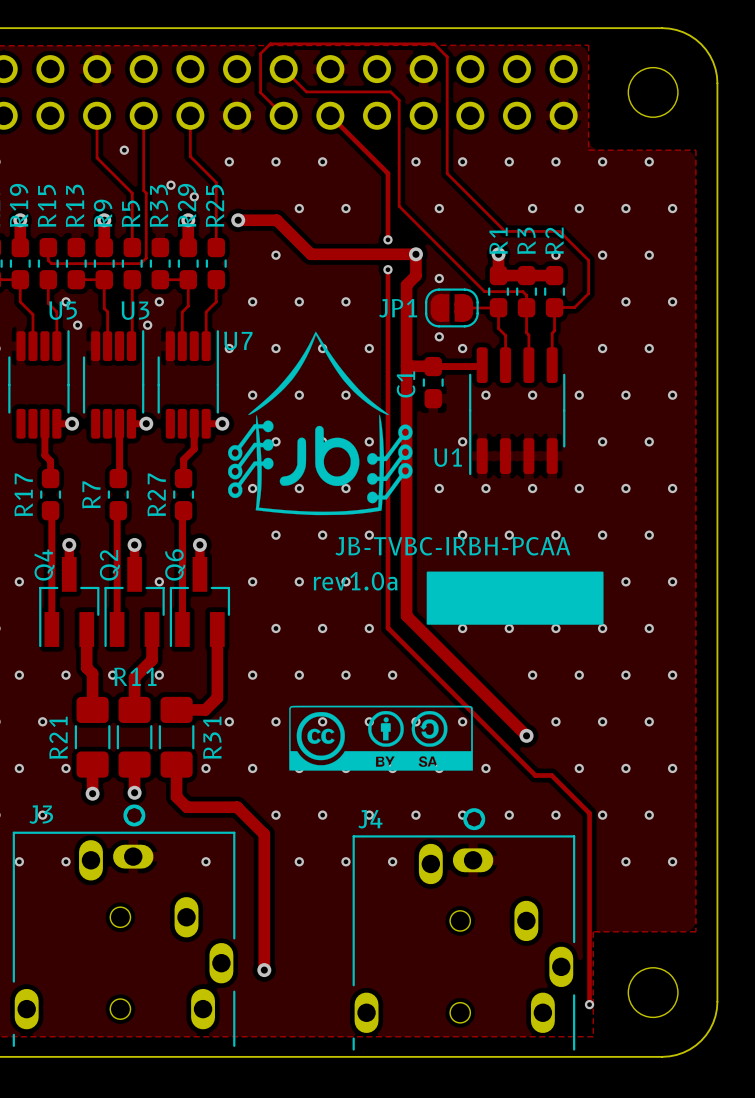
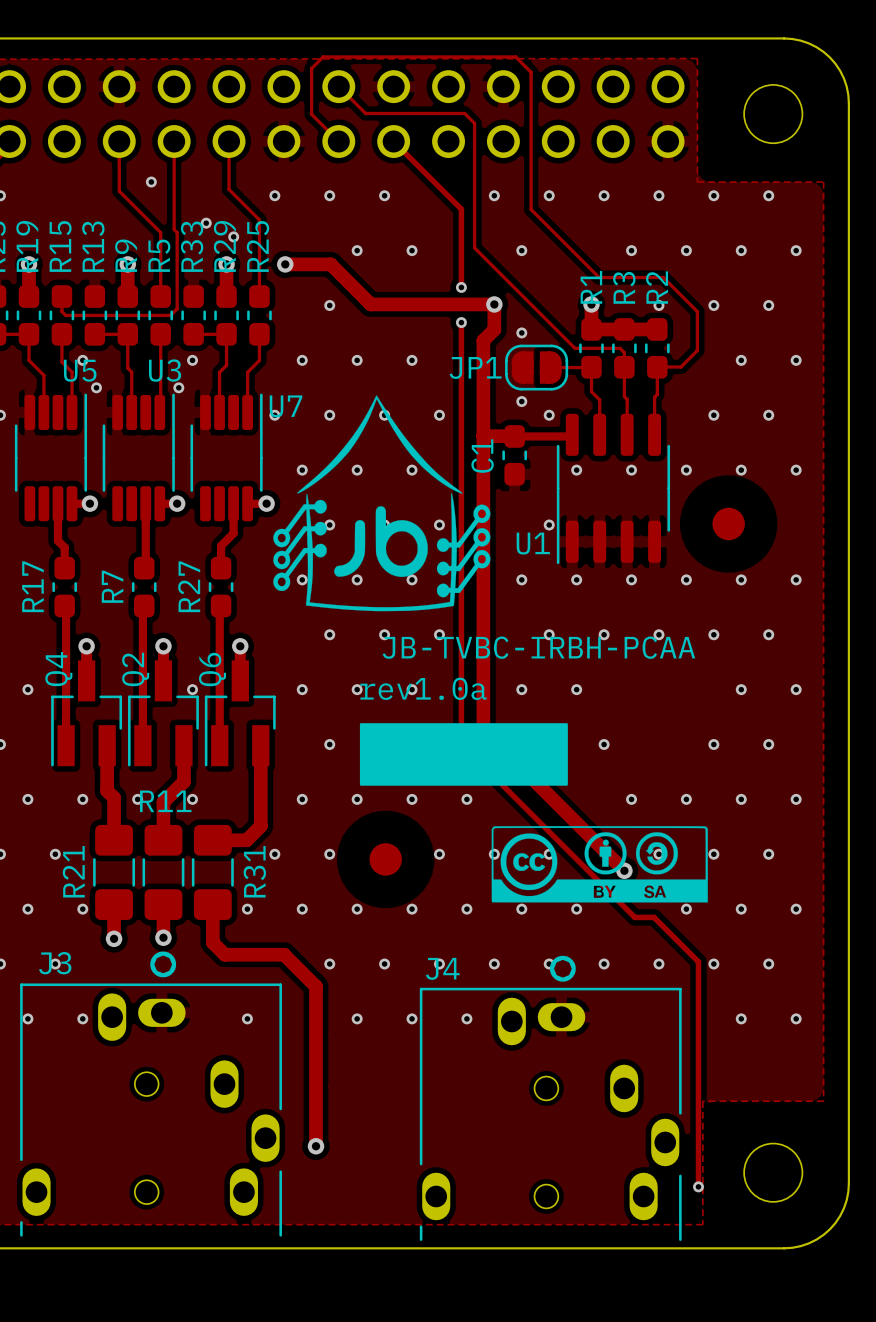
part: none -> (728, 523)
via: (602, 441) -> none
via: (649, 441) -> none
drawing position: (515, 598) -> (463, 754)
via: (555, 628) -> none
via: (322, 721) -> none
part: none -> (385, 859)
drawing position: (381, 738) -> (599, 864)

